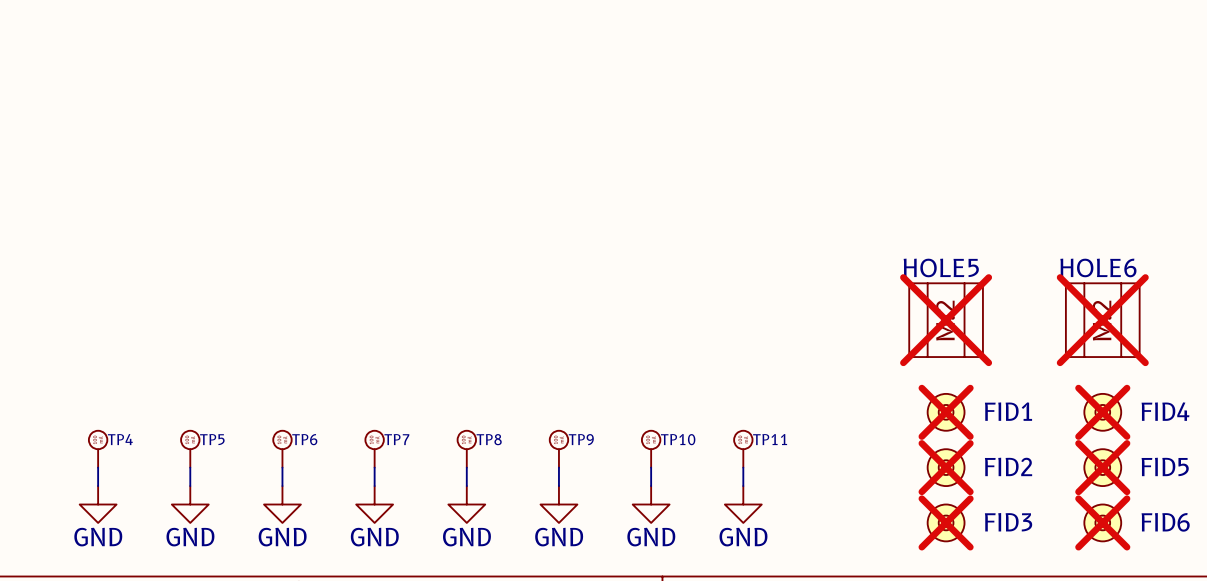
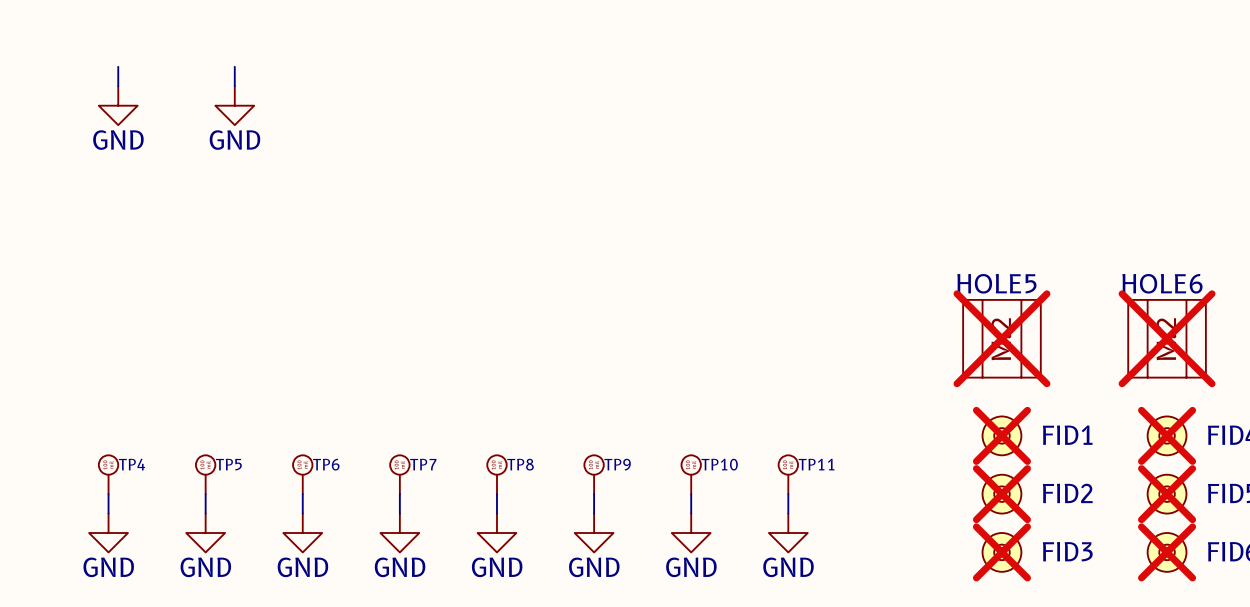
wire: none -> (118, 66) (118, 86)
wire: none -> (234, 66) (234, 86)
power symbol: none -> GND (118, 105)
power symbol: none -> GND (234, 105)

